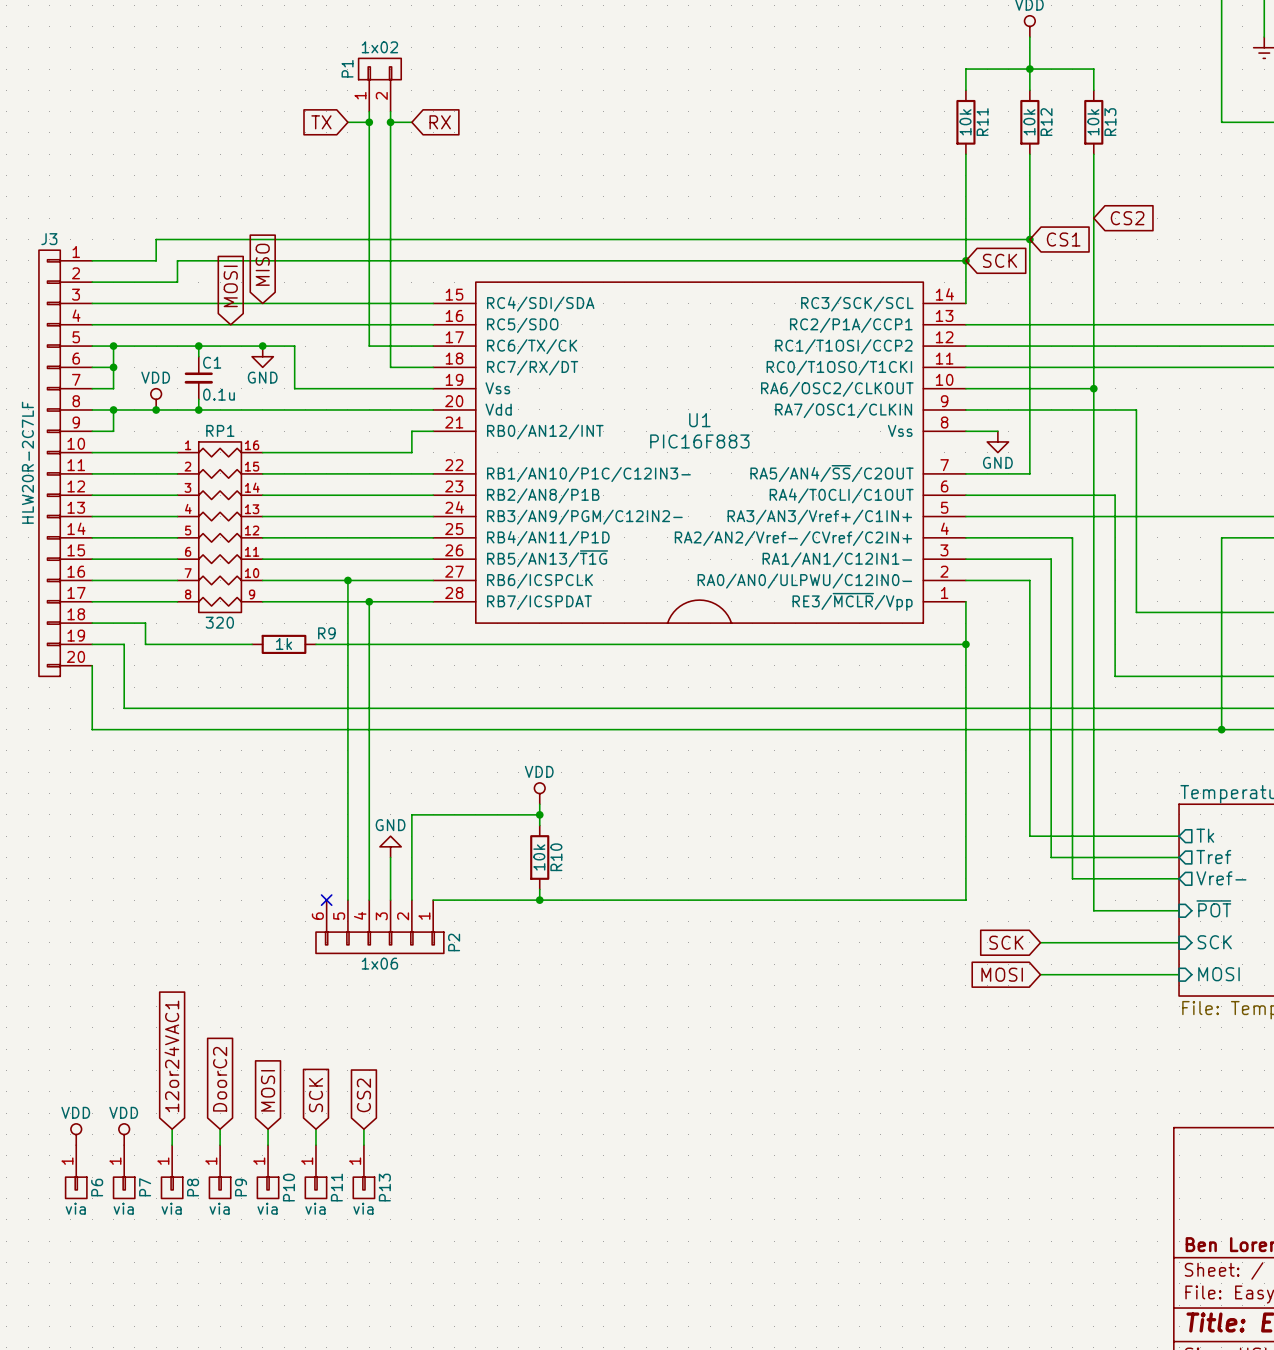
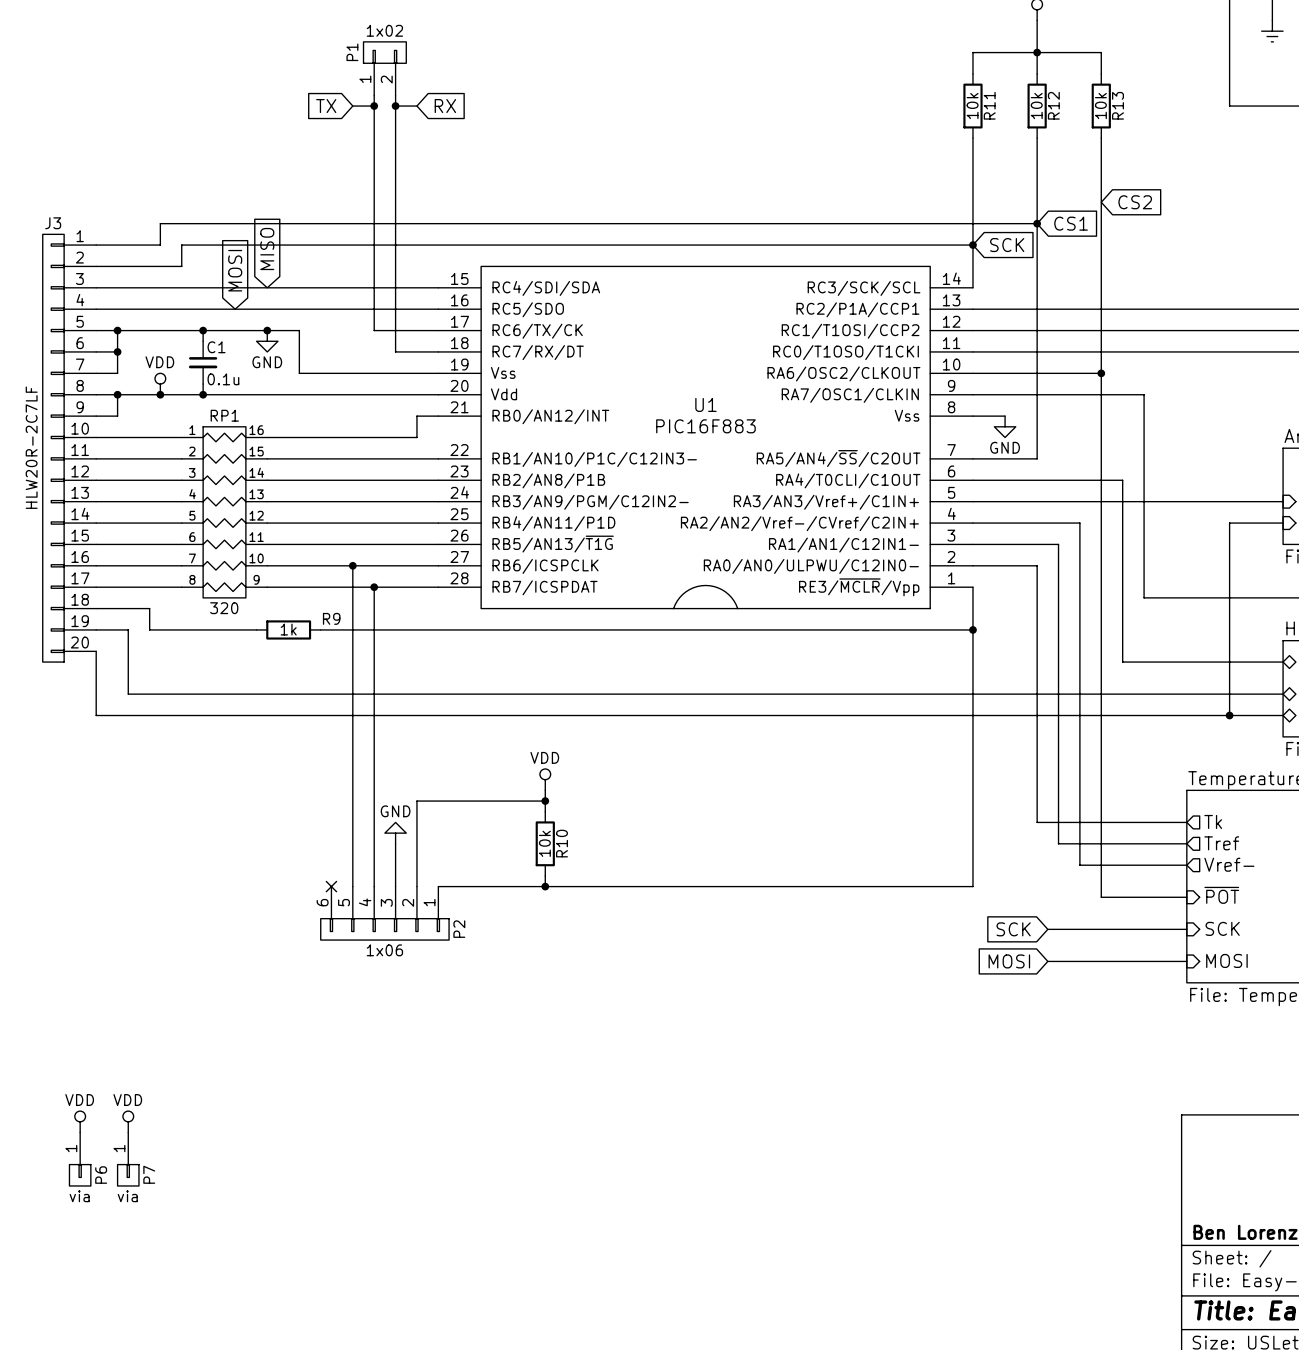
global label: 12or24VAC1 (171, 1056) -> none
global label: DoorC2 (220, 1079) -> none
global label: MOSI (268, 1090) -> none
global label: SCK (315, 1095) -> none
global label: CS2 (363, 1095) -> none
wire: (172, 1129) (172, 1145) -> none
wire: (220, 1129) (220, 1145) -> none
wire: (268, 1129) (268, 1145) -> none
wire: (315, 1129) (315, 1145) -> none
wire: (363, 1129) (363, 1145) -> none
P8: via (172, 1171) -> none
P9: via (220, 1171) -> none
P10: via (268, 1171) -> none
P11: via (315, 1171) -> none
P13: via (363, 1171) -> none

